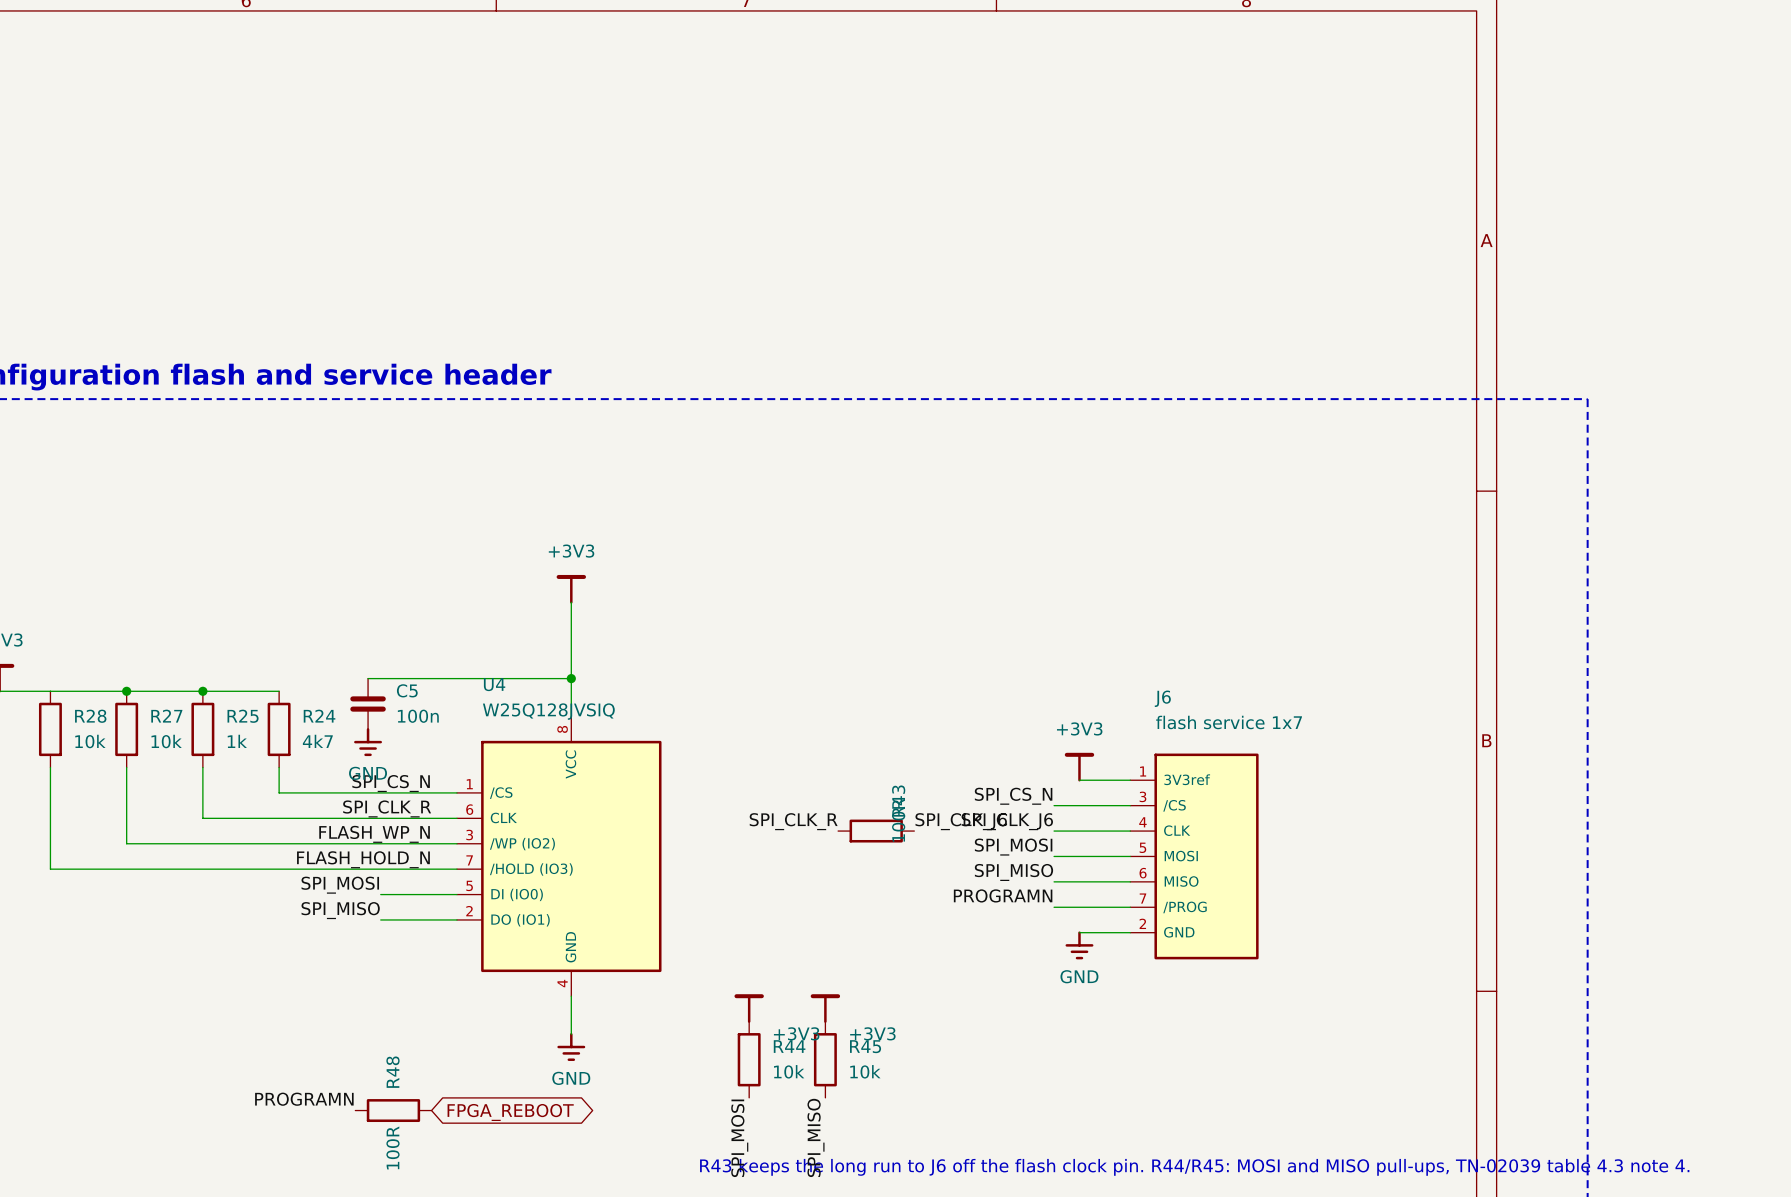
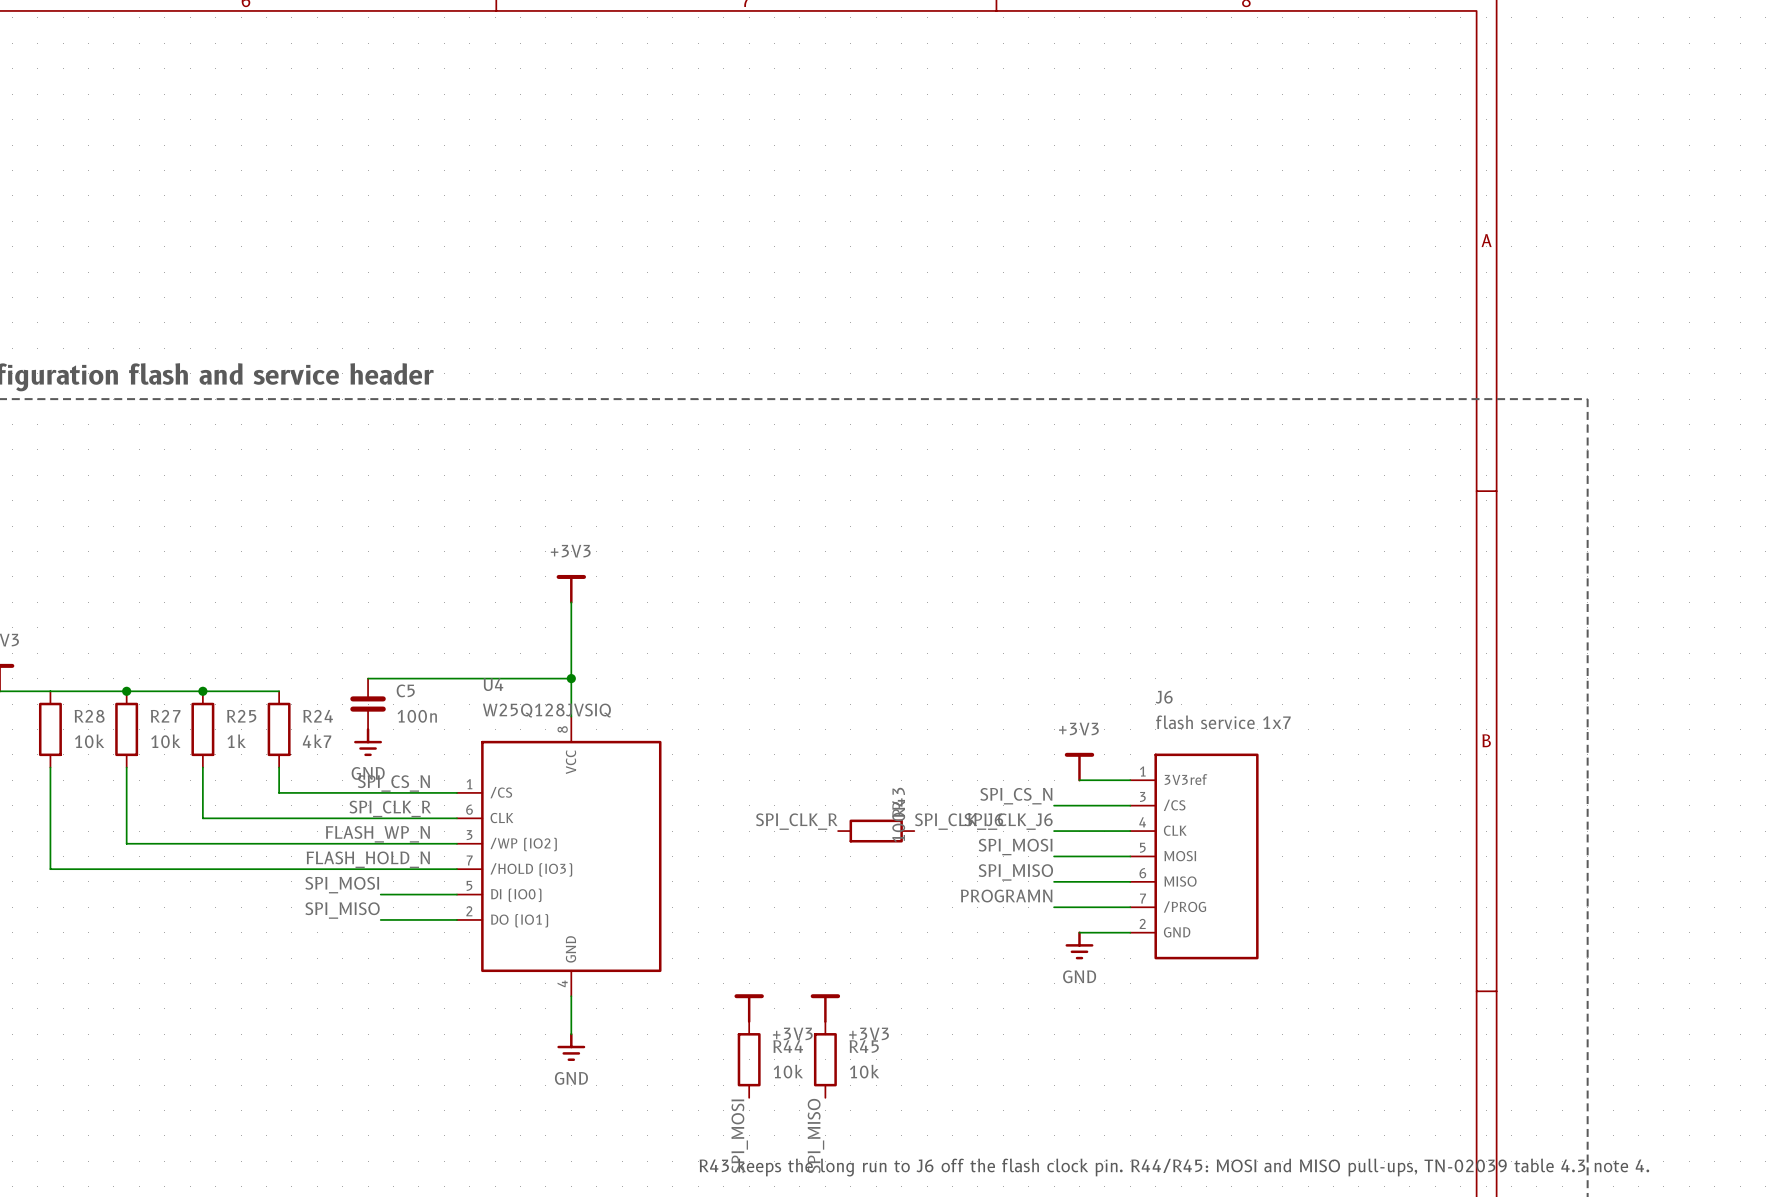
label: PROGRAMN (304, 1099) -> none
R48: 100R (393, 1110) -> none
global label: FPGA_REBOOT (510, 1112) -> none

